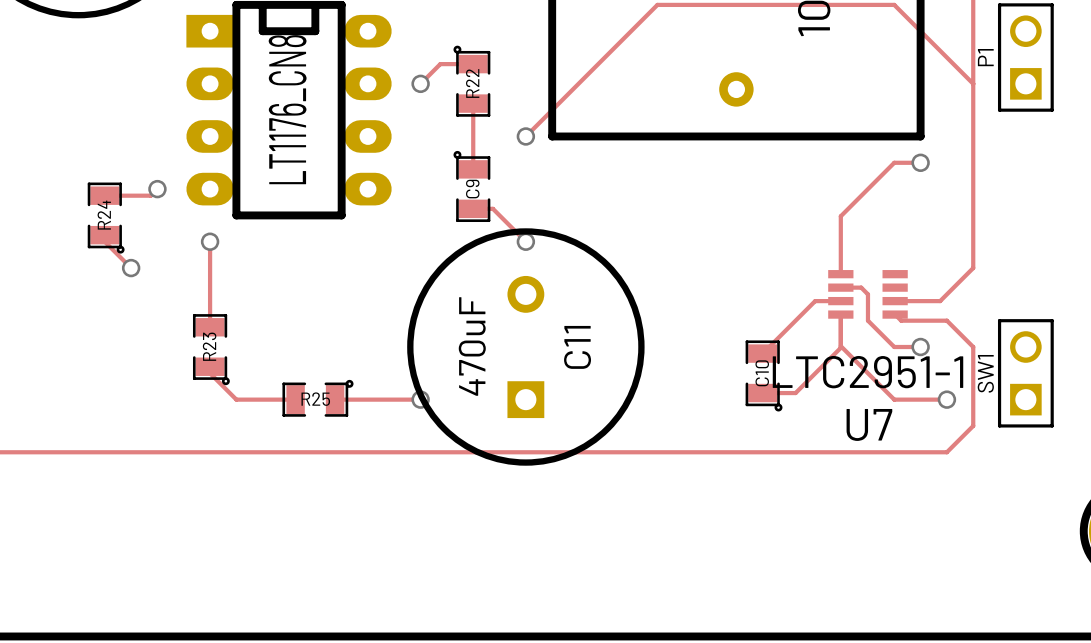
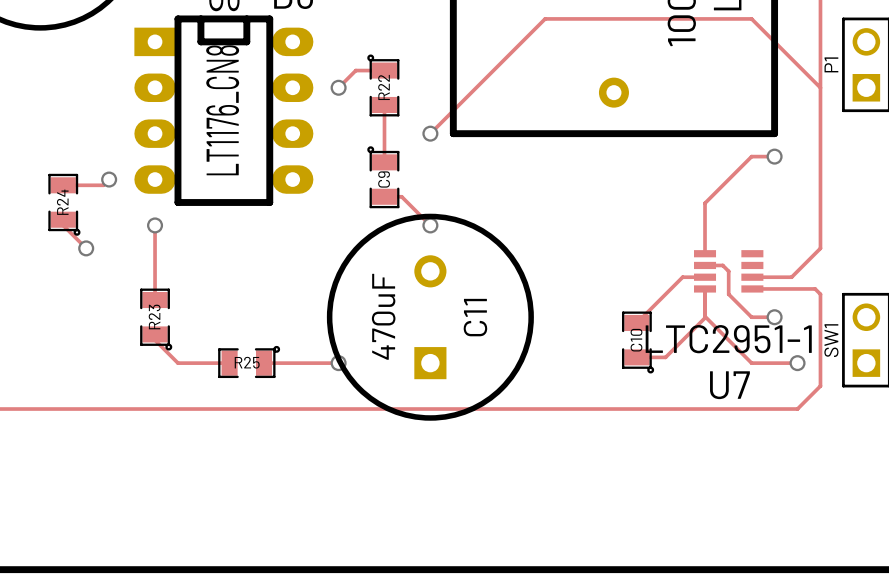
track: (895, 314) (901, 320) (946, 320) (973, 347) -> (752, 288) (815, 288) (820, 294) (820, 317)

